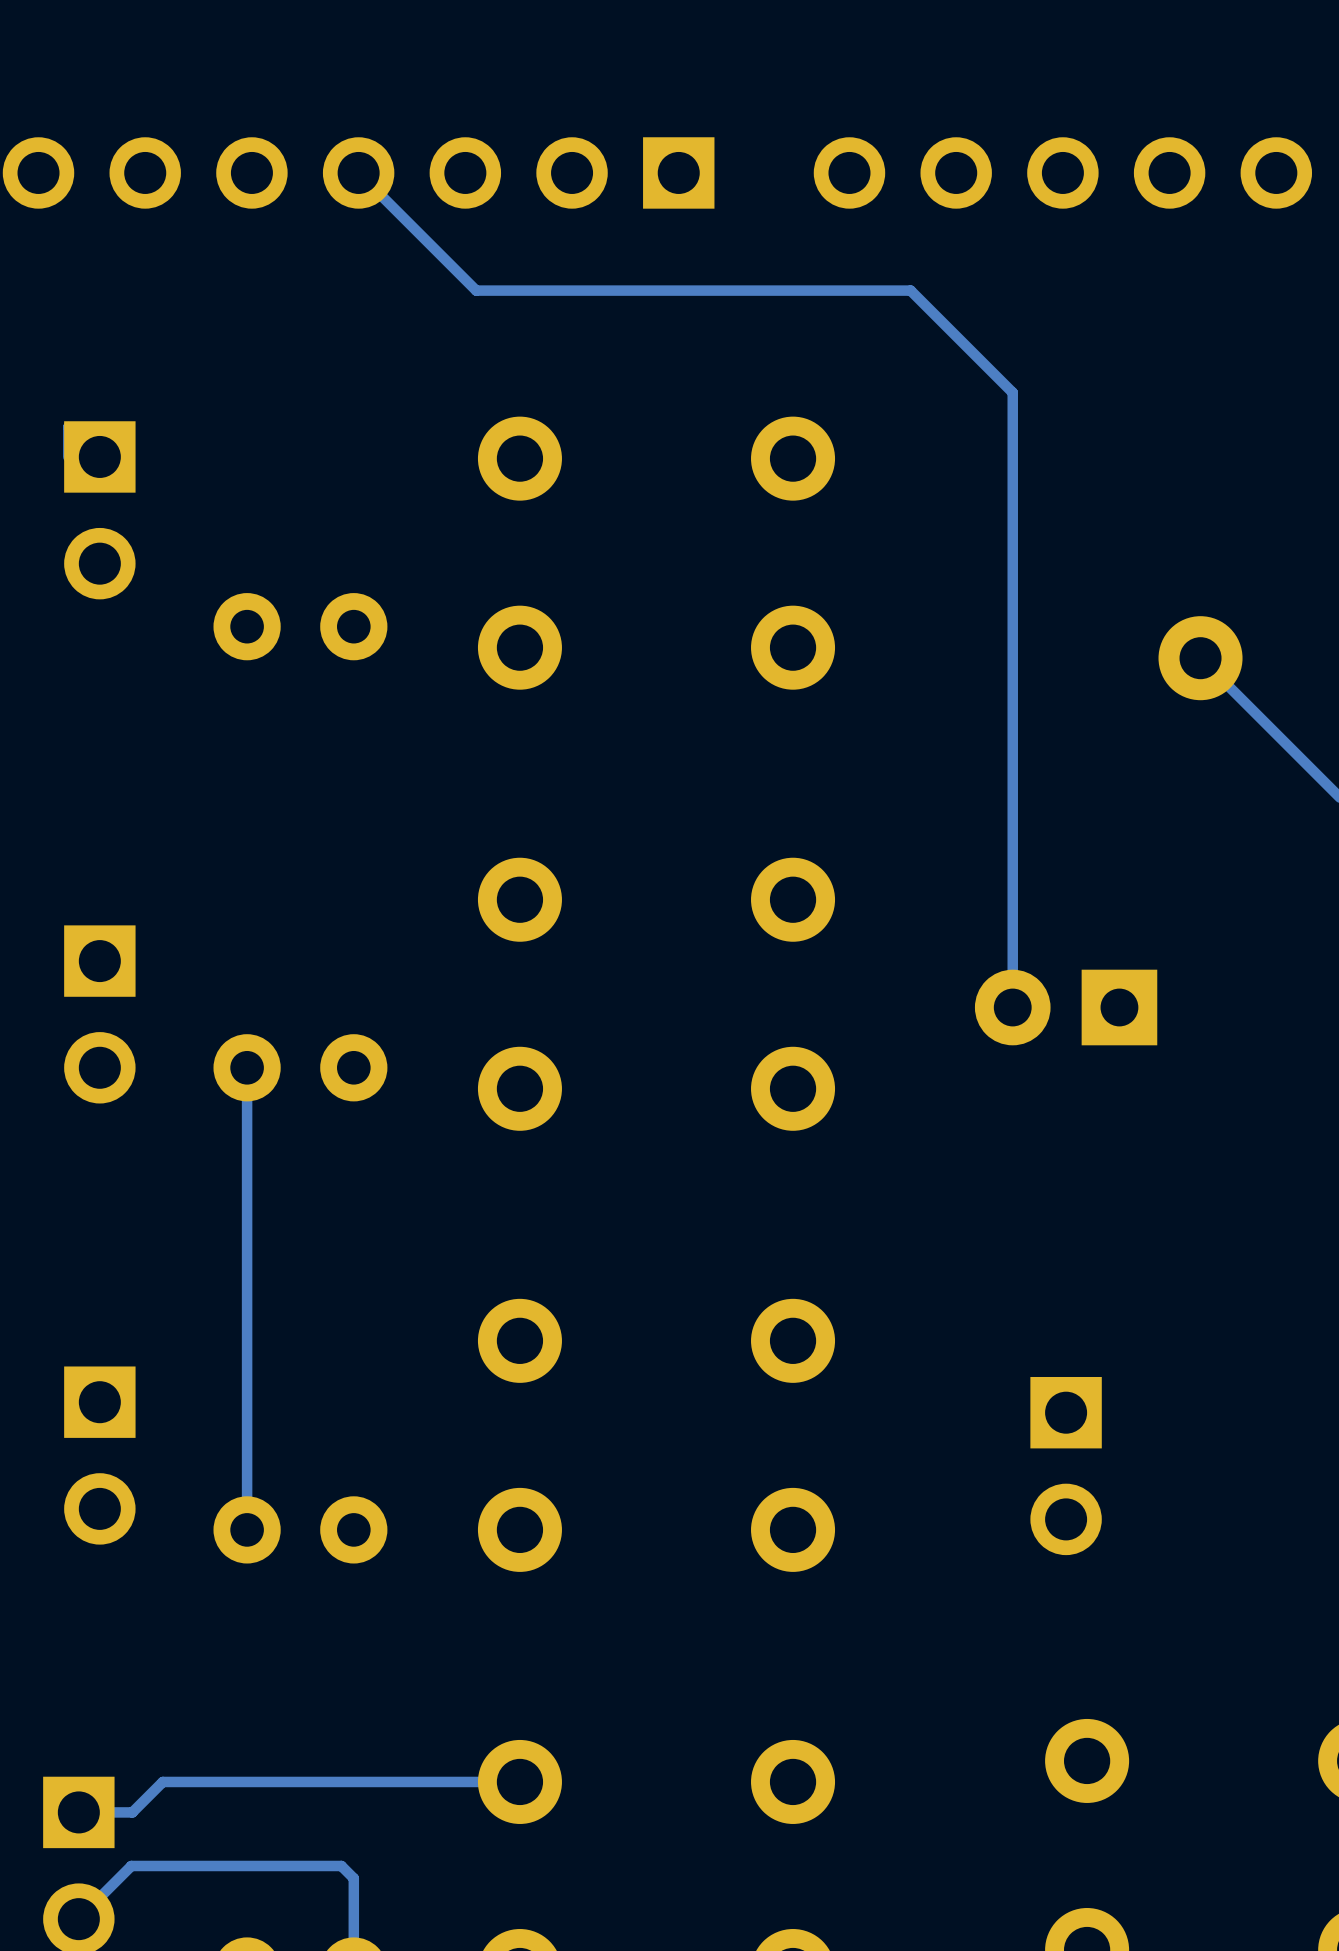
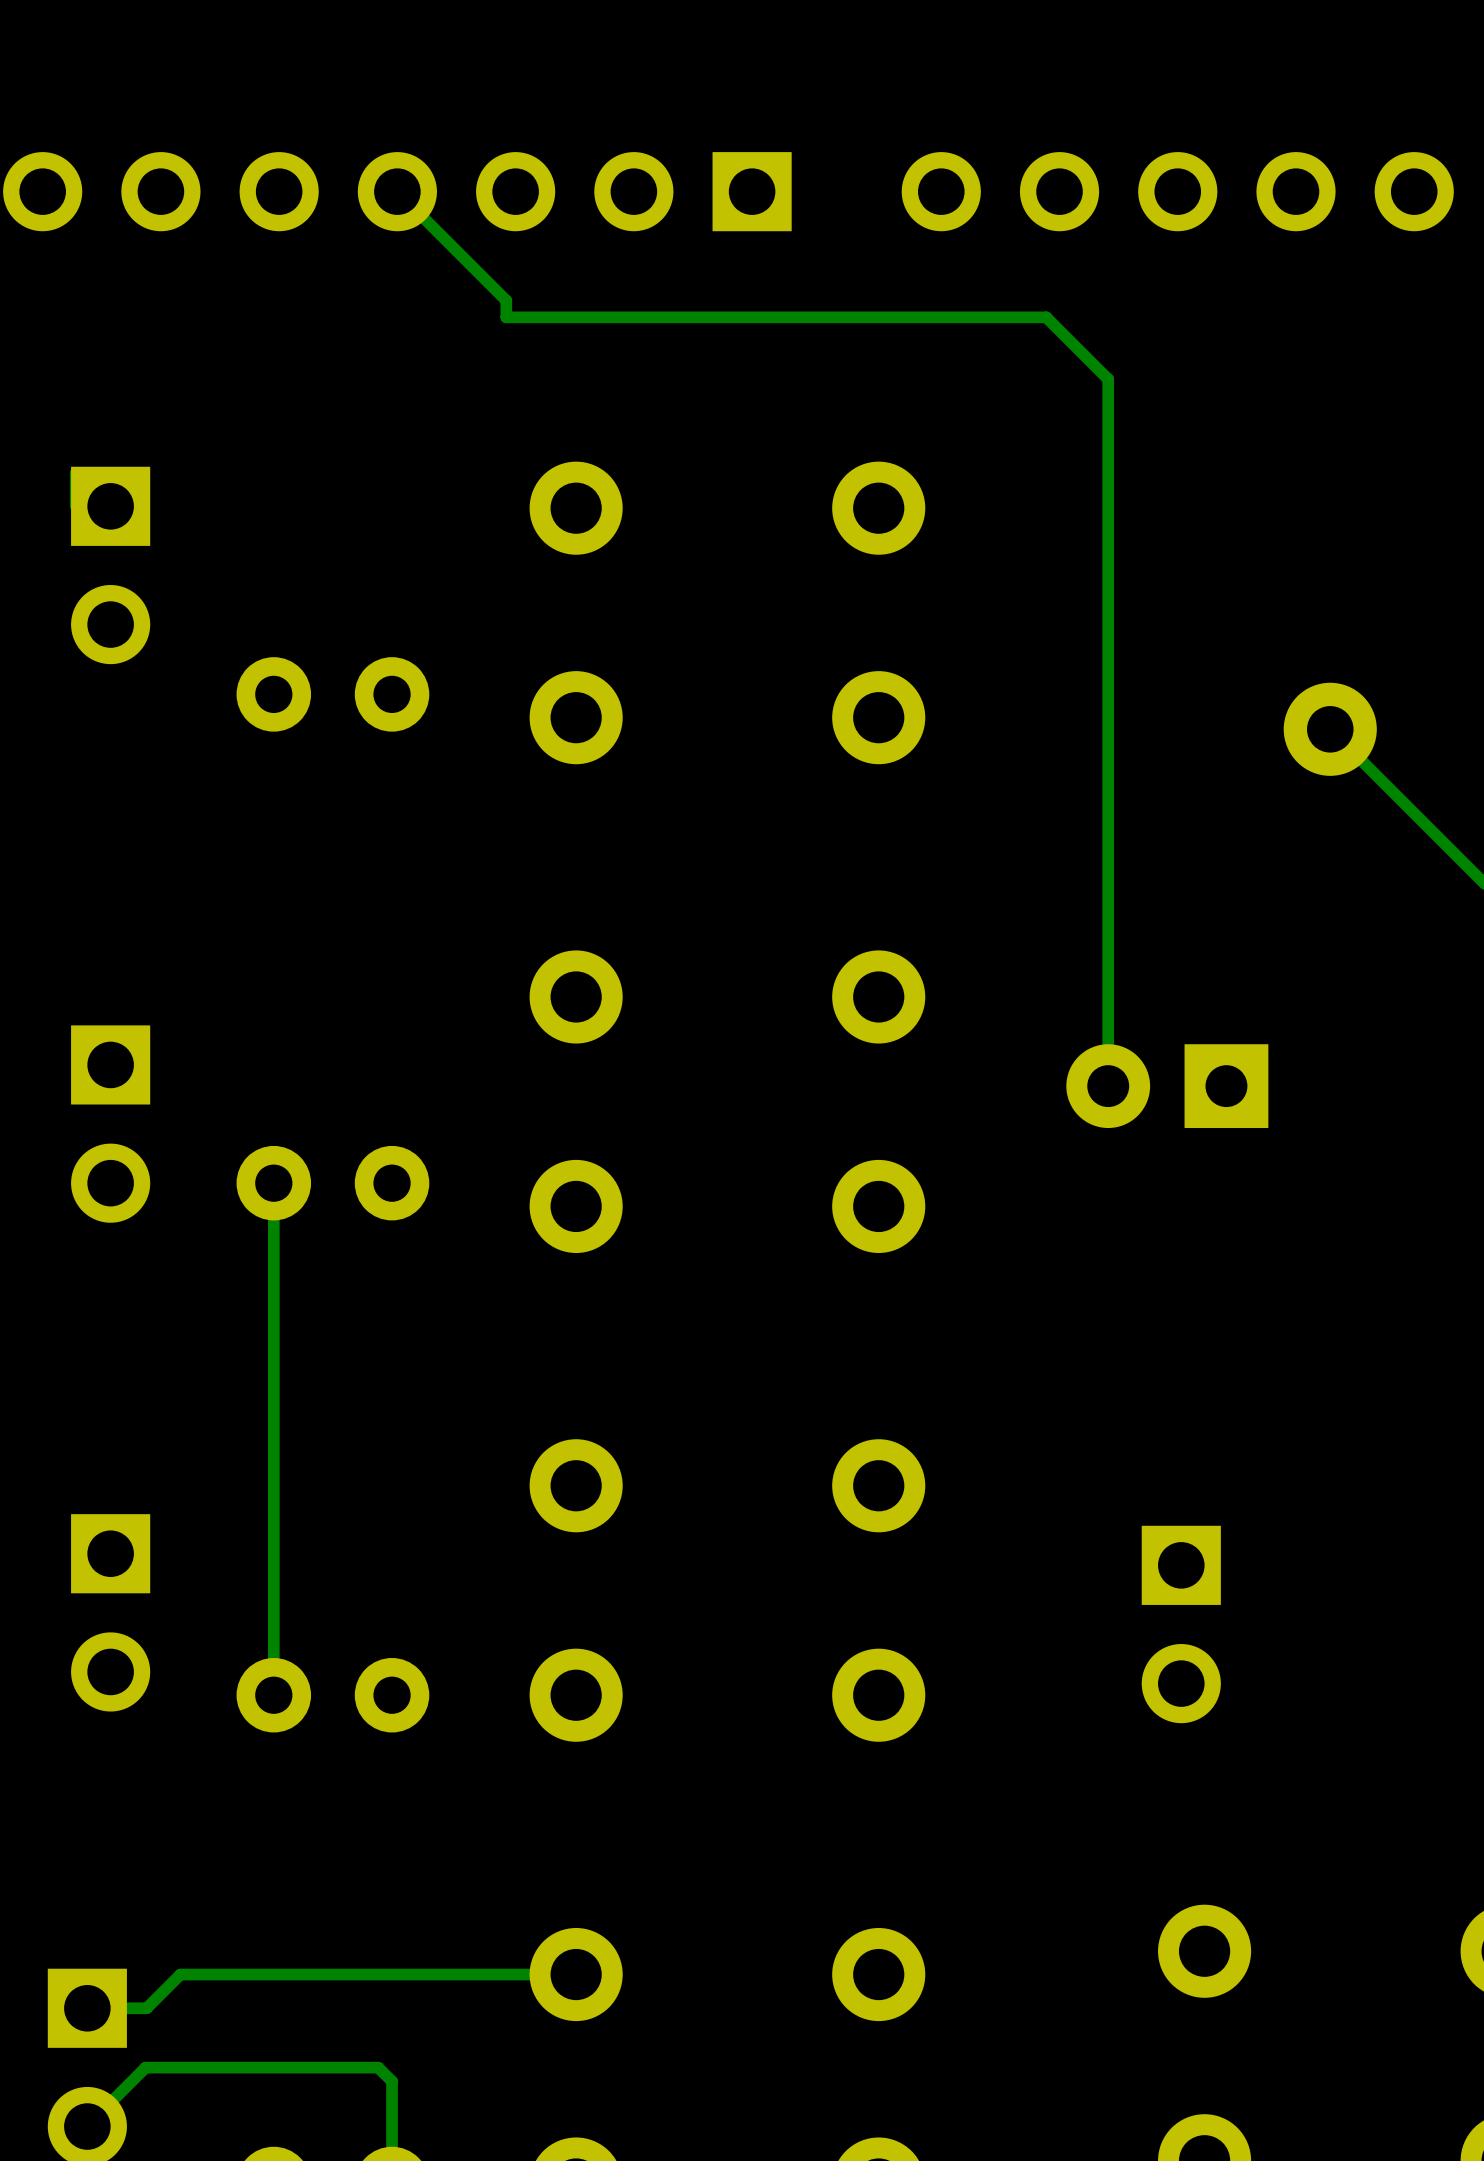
track: (456, 271) (476, 290) (910, 290) (1012, 392) (1012, 1007) -> (506, 300) (506, 317) (1046, 317) (1108, 379) (1108, 1086)
part position: (1066, 1007) -> (1167, 1086)

